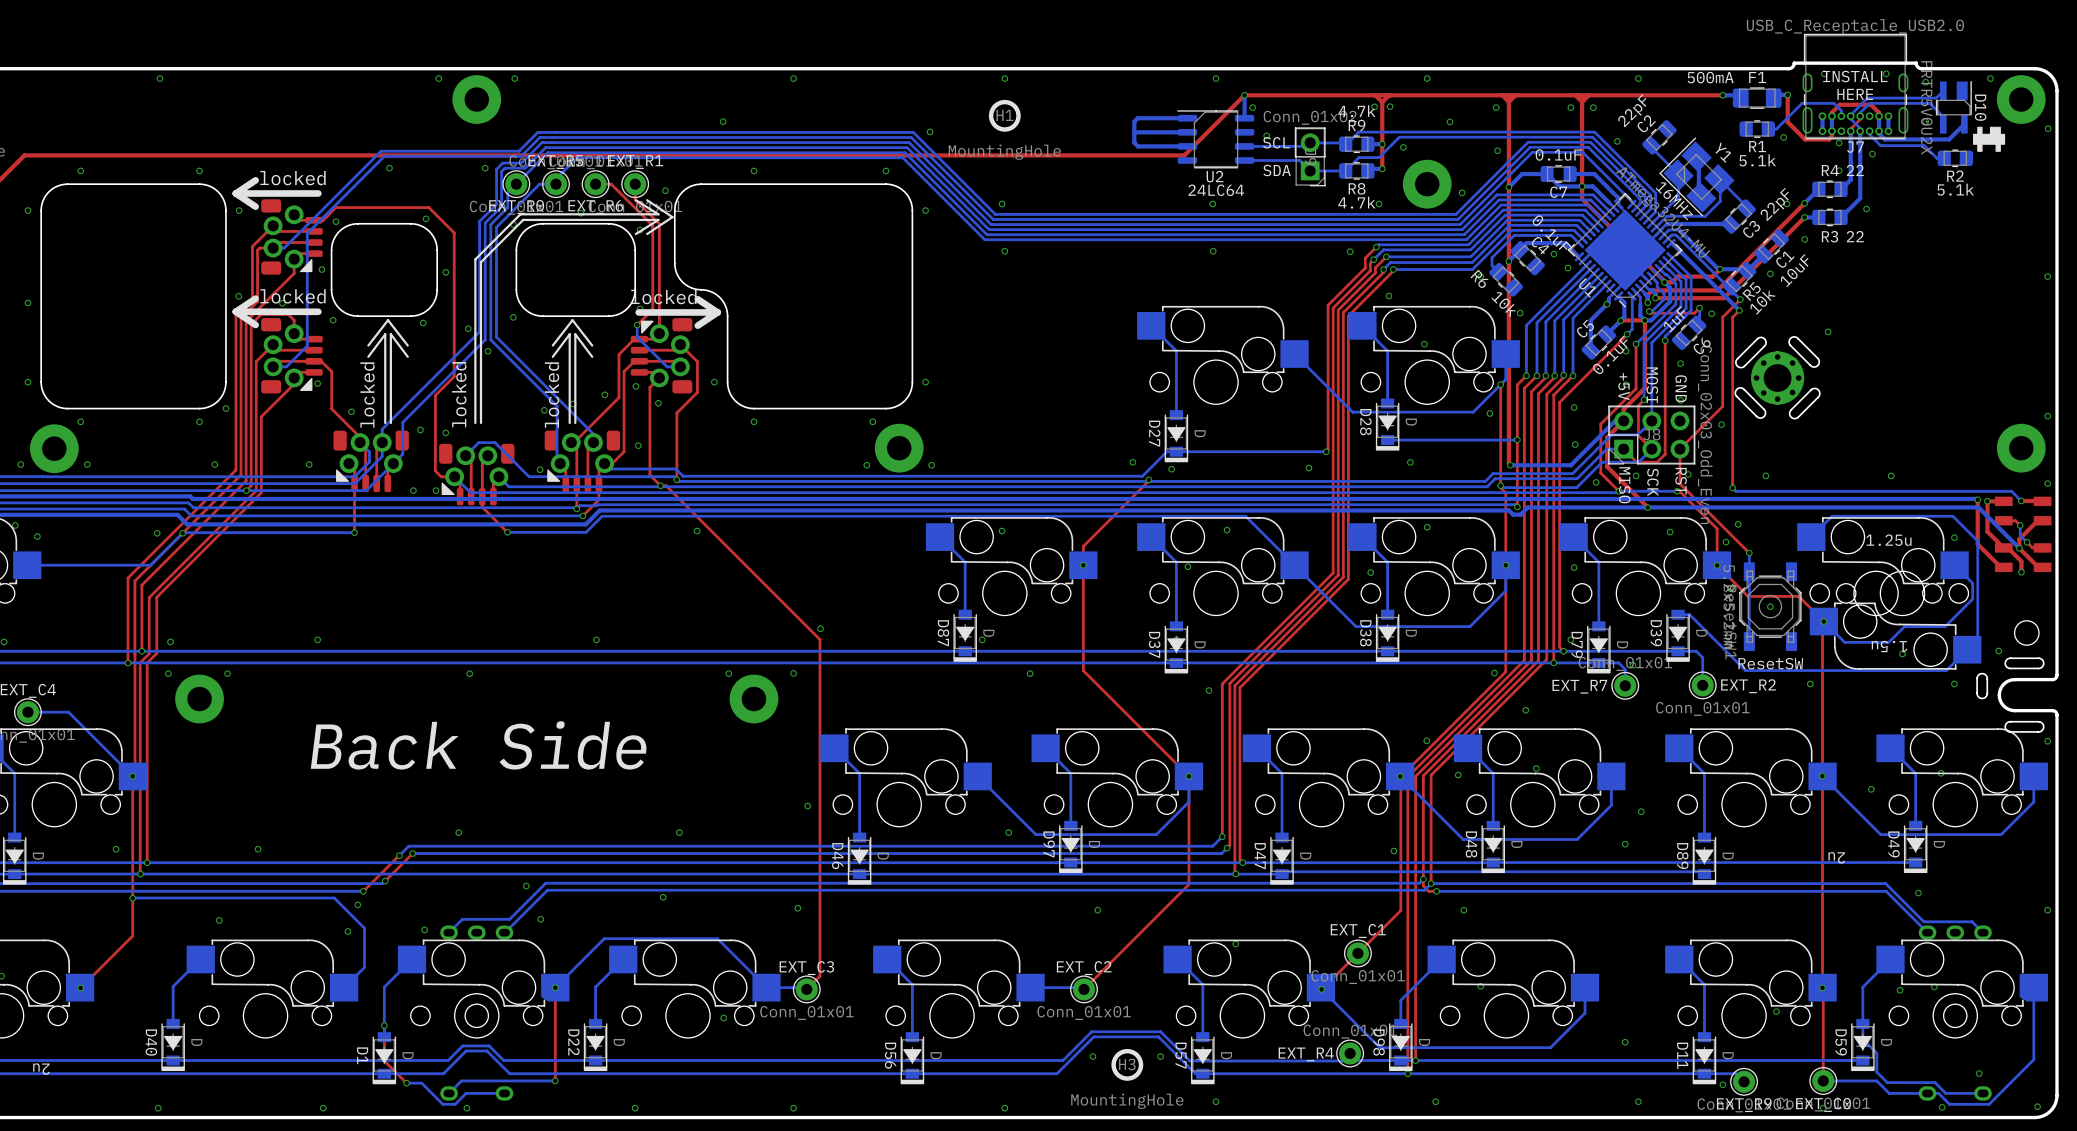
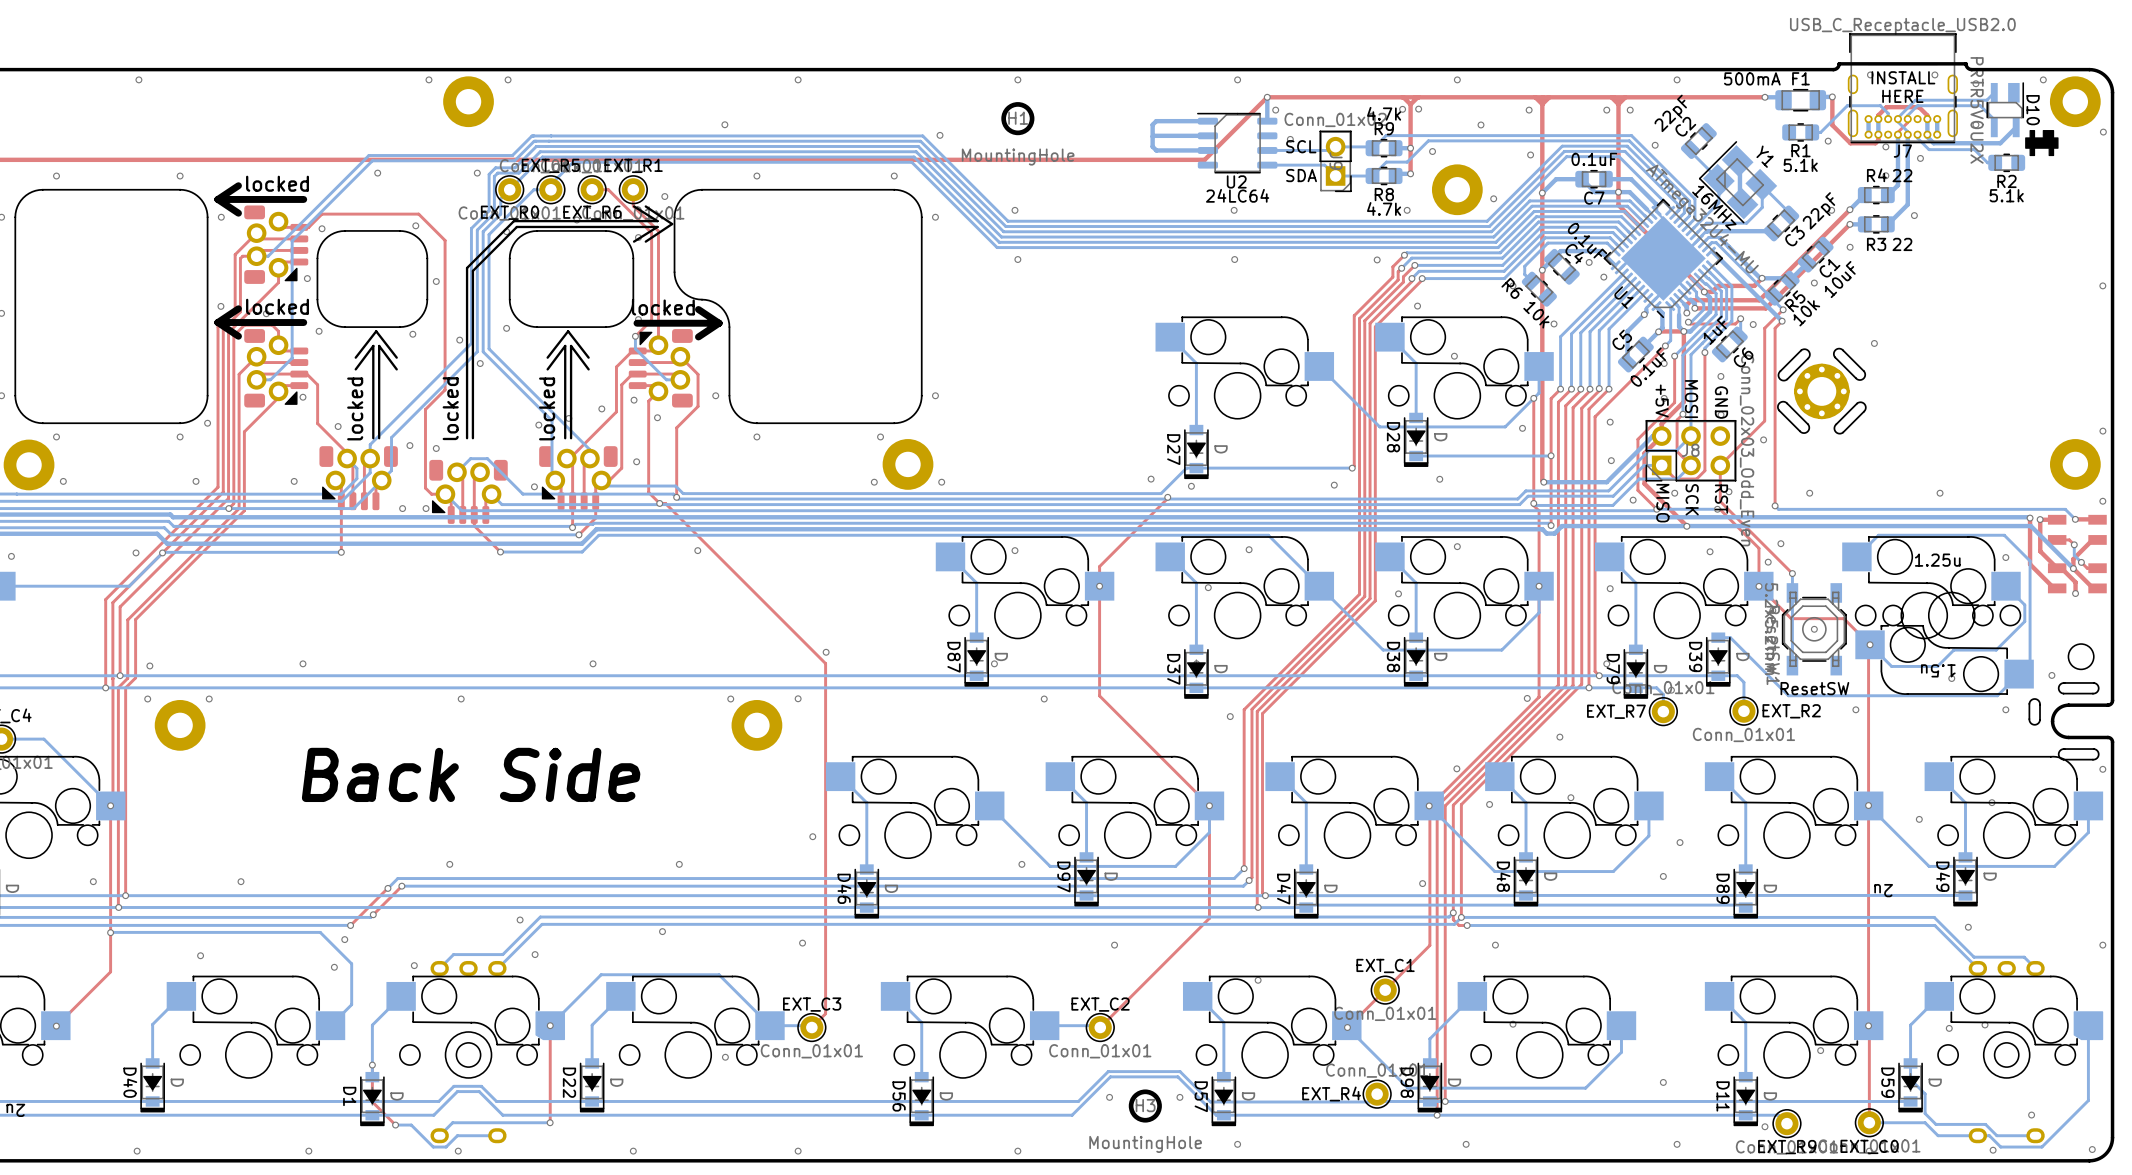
J7 footprint: [1802, 33, 1909, 140] -> [1847, 33, 1958, 144]

